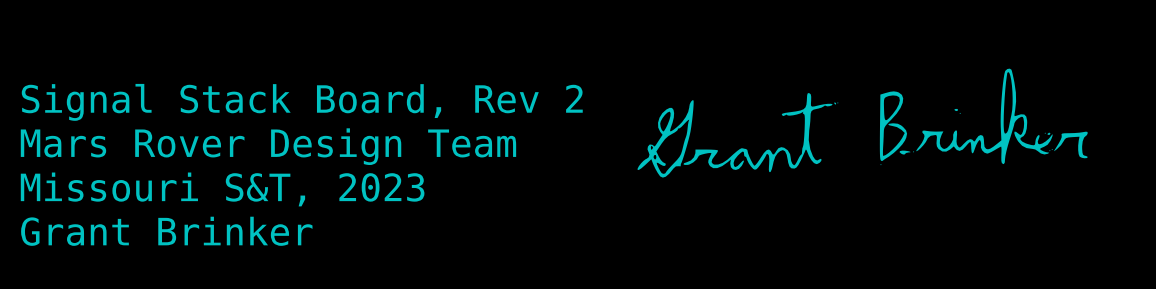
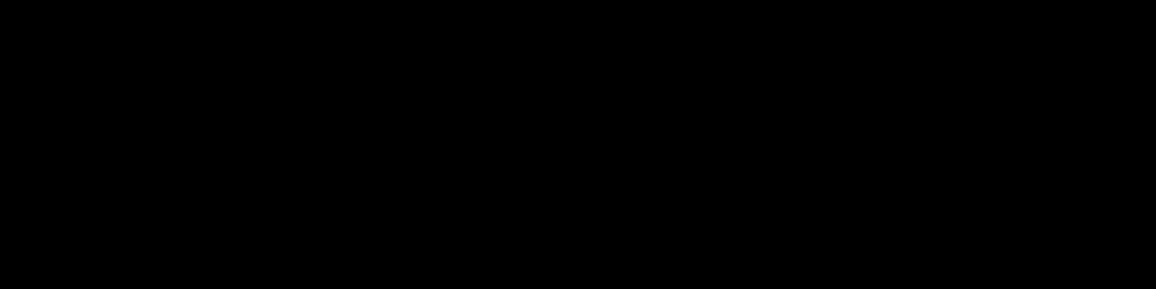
drawing: [637, 68, 1088, 178] -> none
text: Signal Stack Board, Rev 2 (302, 102) -> none
text: Mars Rover Design Team (268, 146) -> none
text: Missouri S&T, 2023 (222, 189) -> none
text: Grant Brinker (166, 231) -> none

